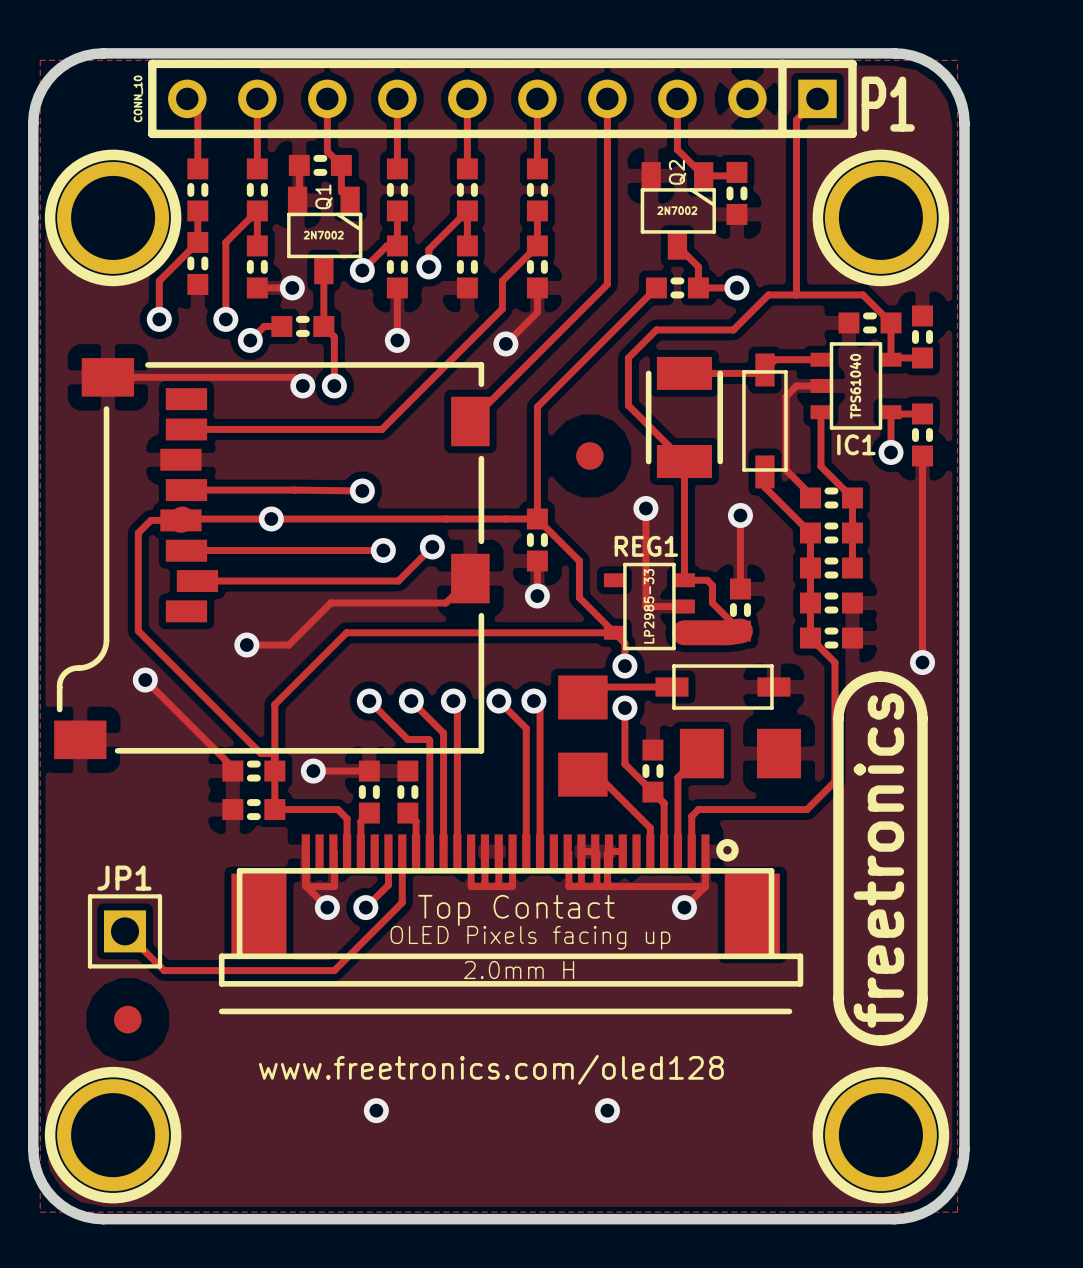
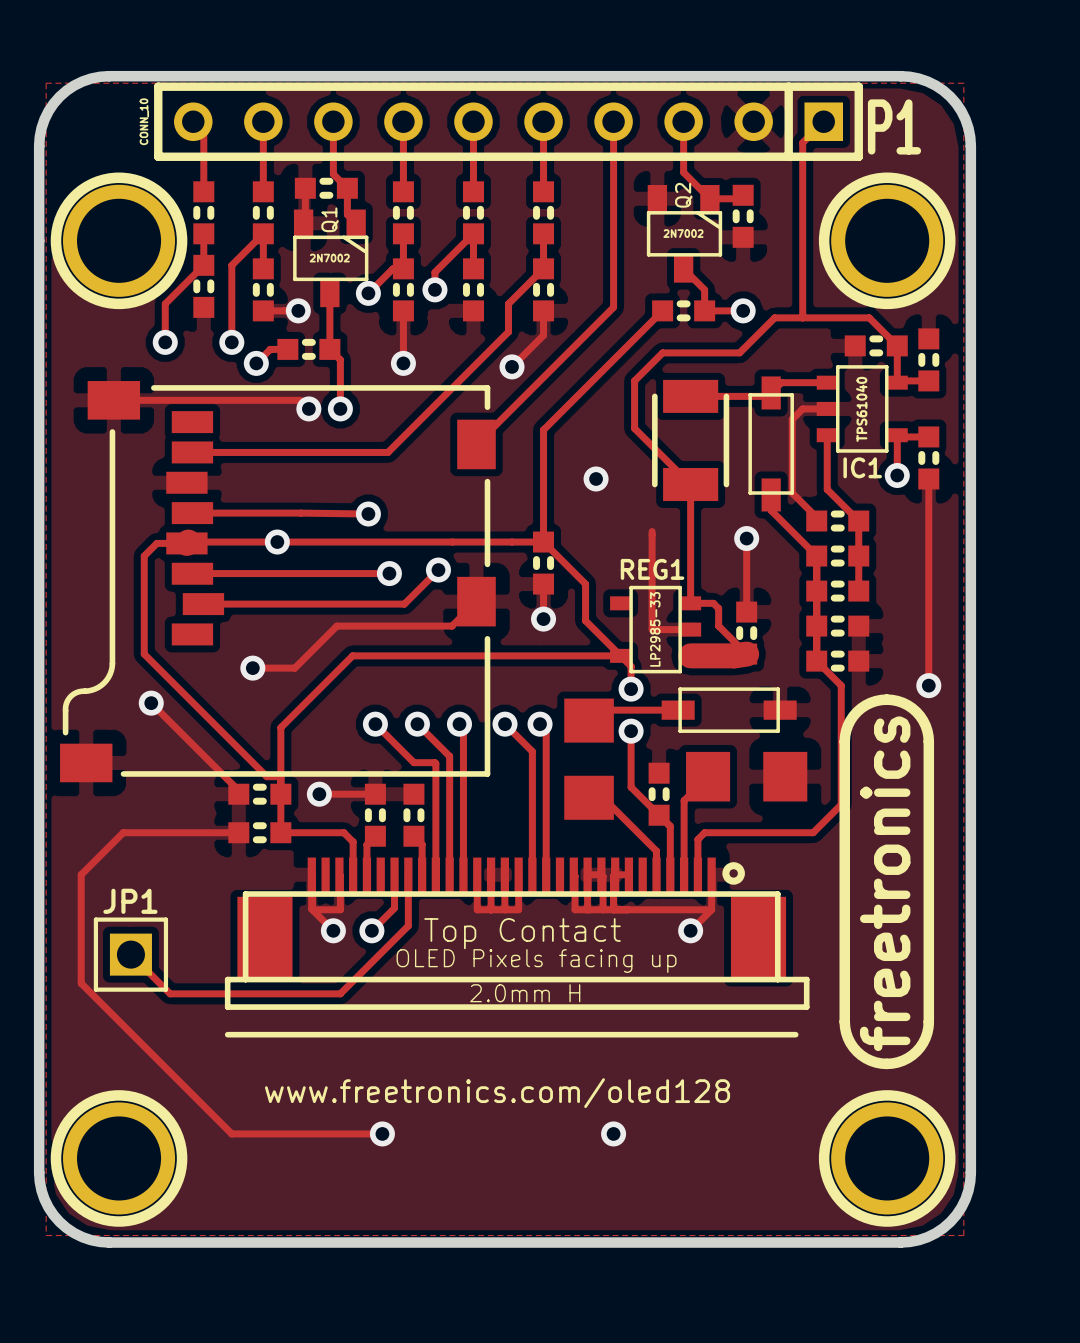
part: (589, 455) -> none
via position: (645, 508) -> (596, 478)
track: none -> (238, 832) (123, 832) (81, 874) (81, 983) (231, 1133) (382, 1133)
part: (127, 1019) -> none

